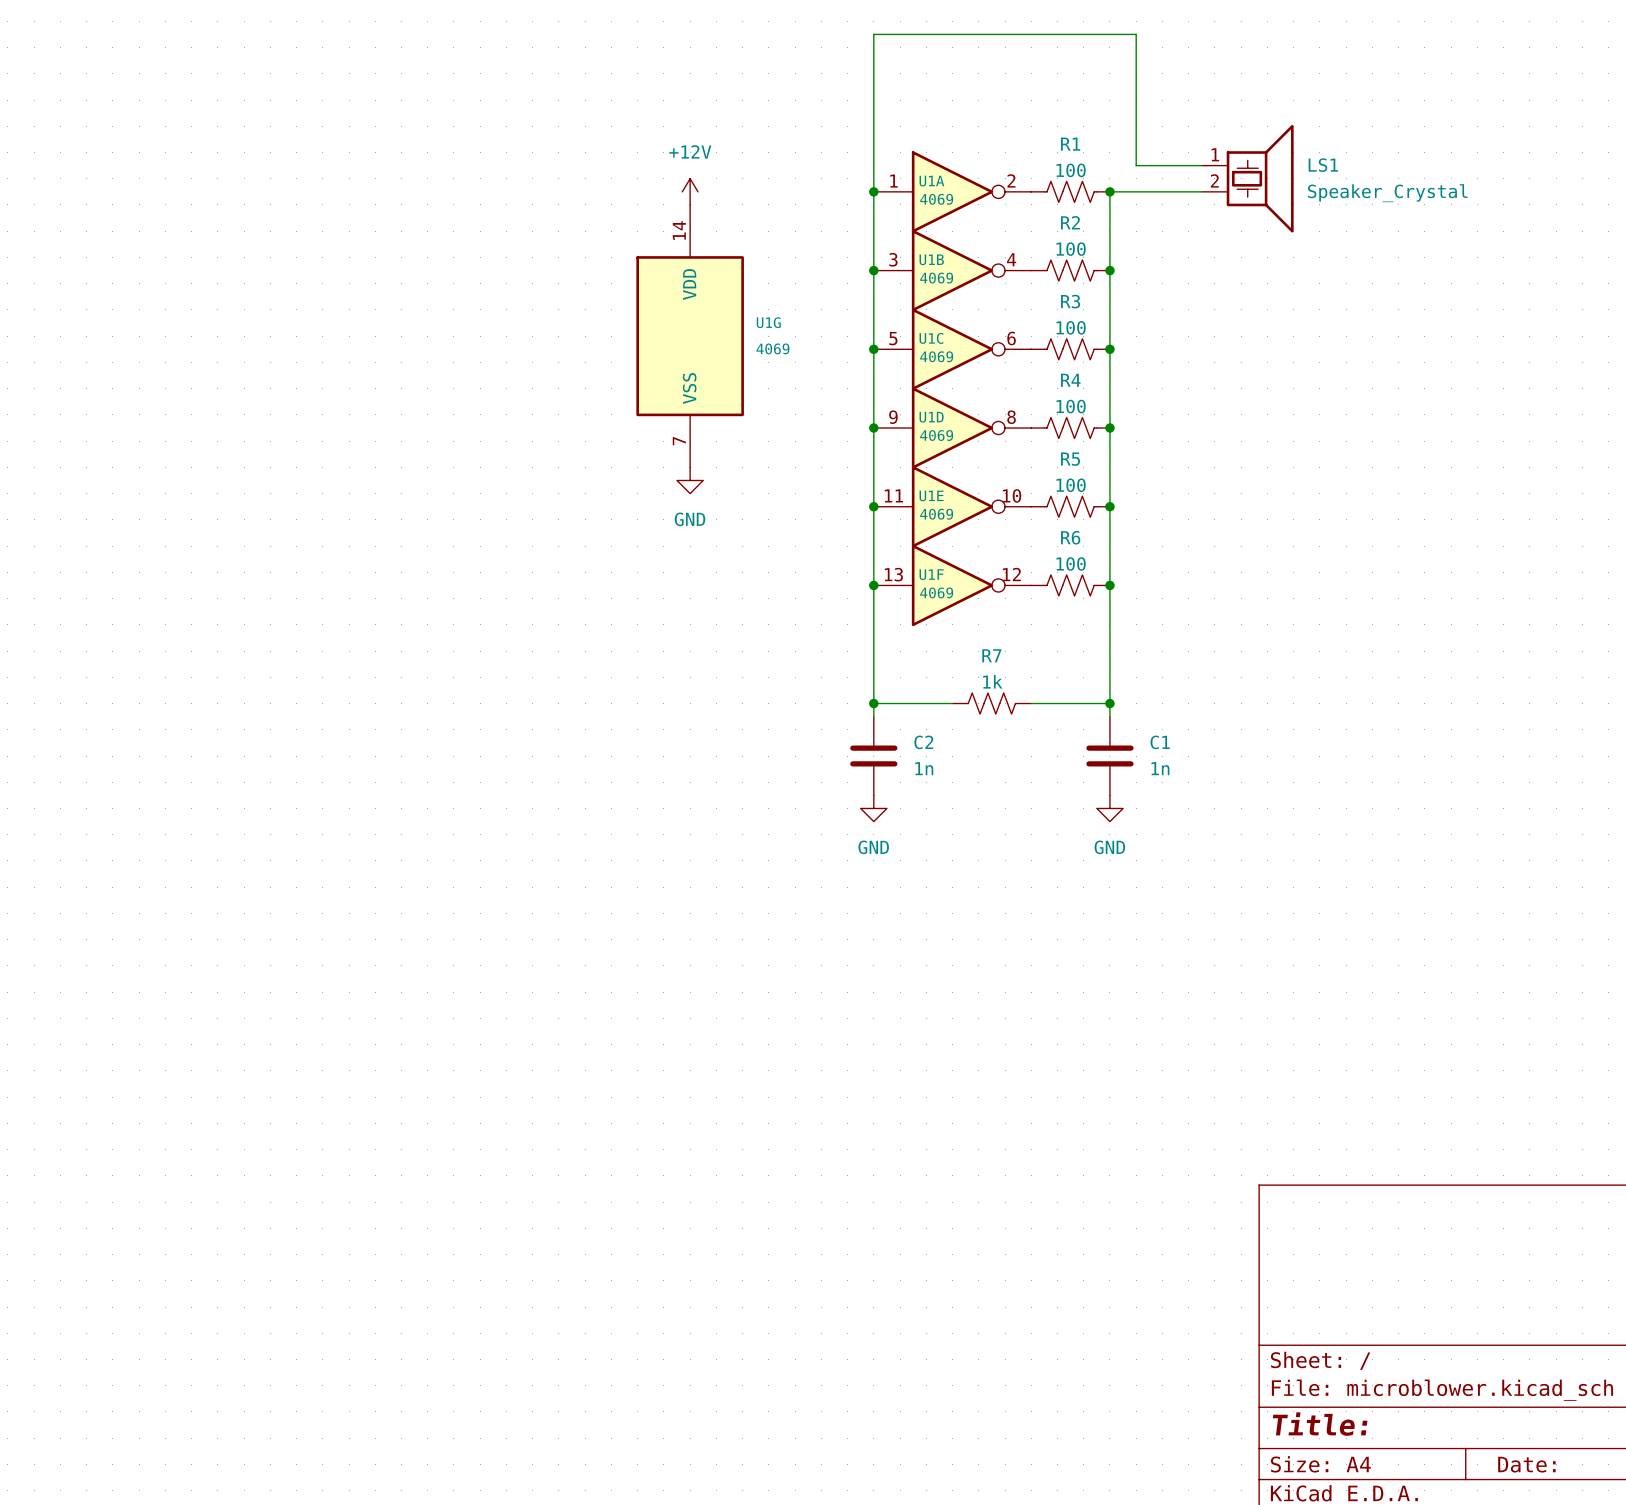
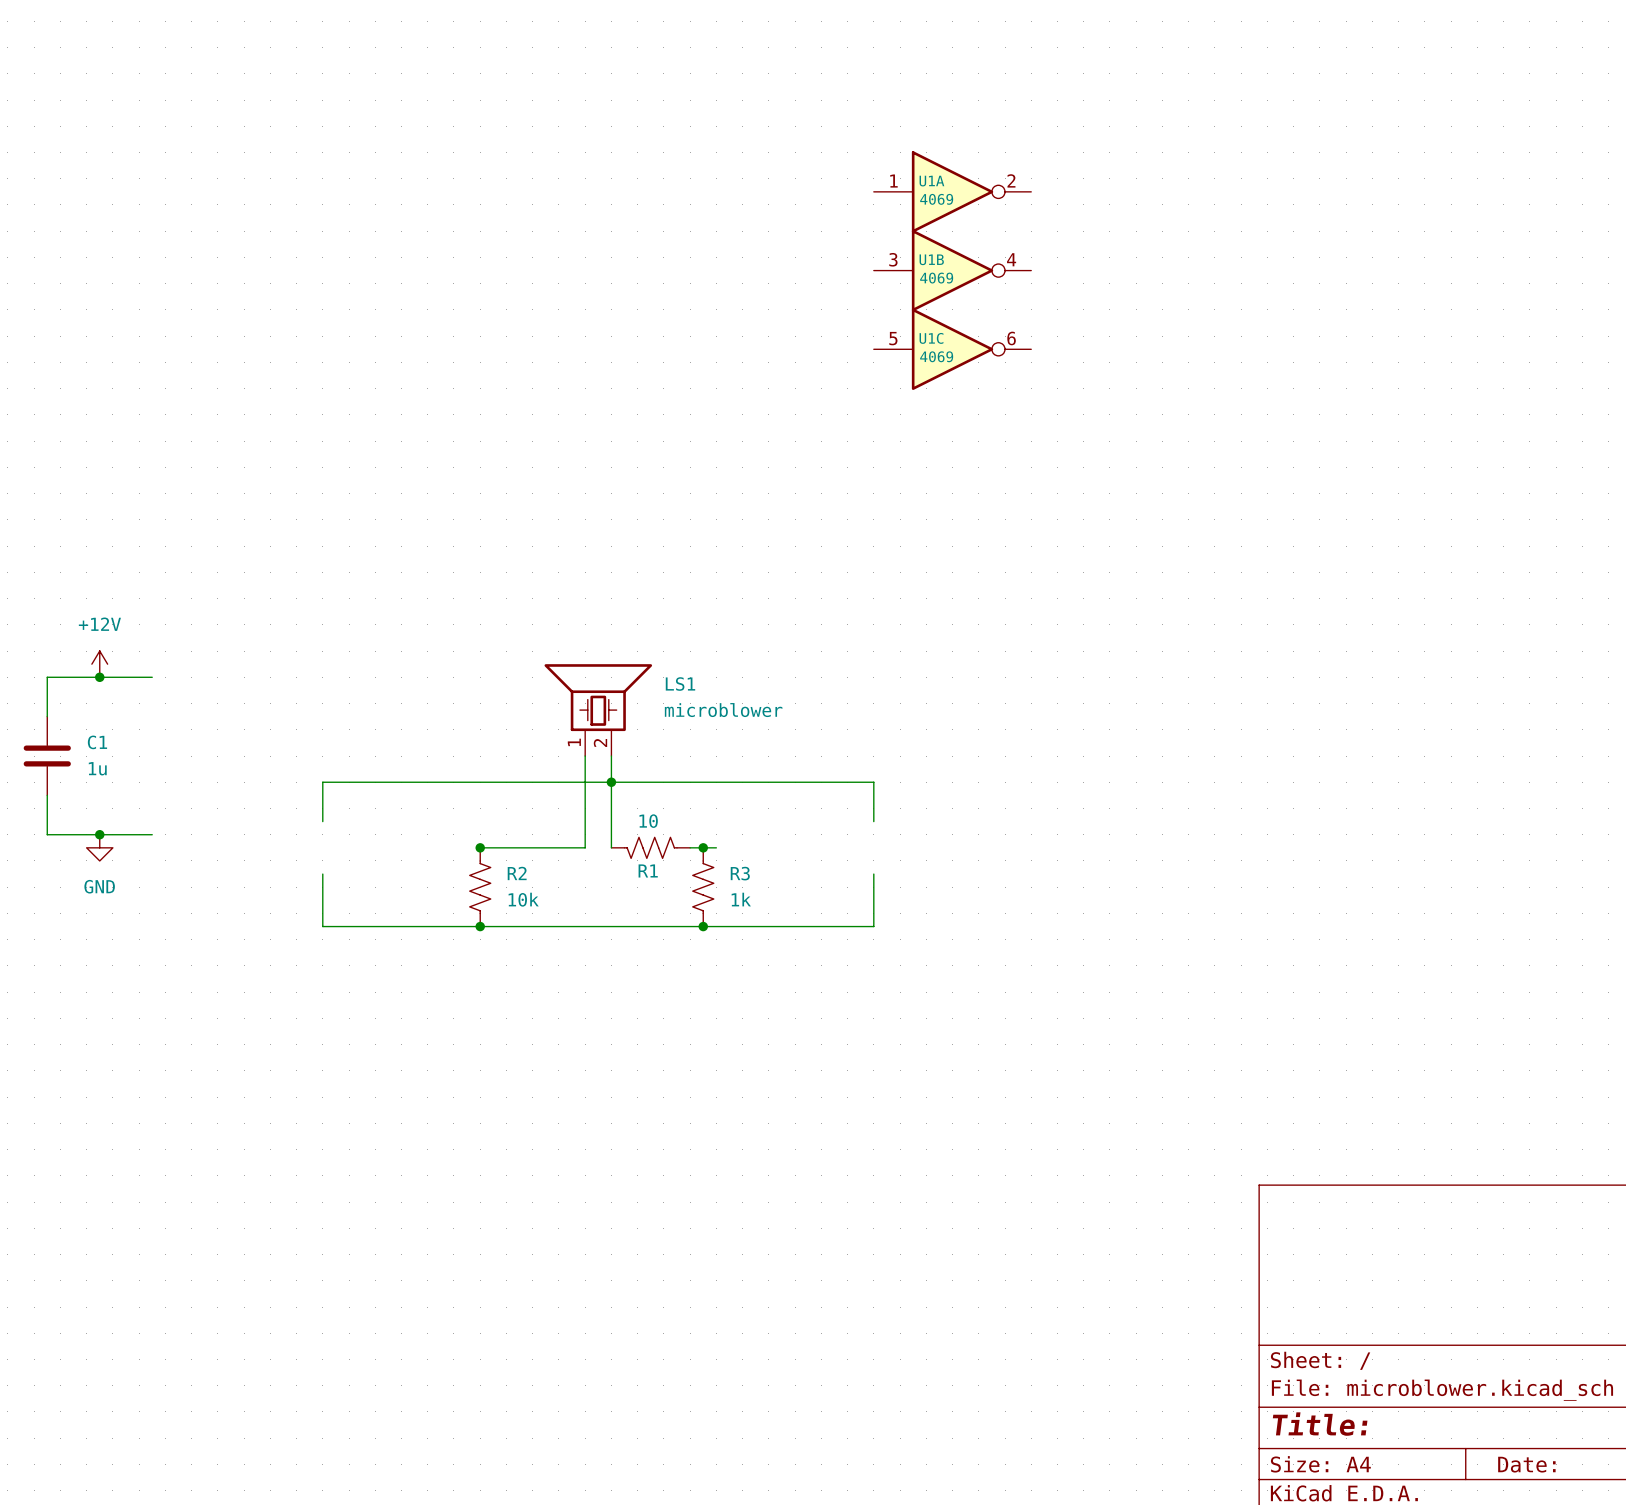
R1 name position: R1 (1070, 144) -> R1 (648, 870)
wire: (1201, 165) (1136, 165) (1136, 34) (873, 34) (873, 716) -> none
R1 value: 100 (1071, 170) -> 10 (648, 821)
LS1 position: (1247, 178) -> (598, 710)
LS1 rotation: 0° (1260, 178) -> 90° counterclockwise (598, 697)
power symbol: +12V (690, 191) -> none
junction: (873, 191) -> none
R1 flip: as is (1070, 191) -> left-right (650, 847)
R1 position: (1070, 191) -> (650, 847)
junction: (1109, 191) -> none
wire: (1201, 191) (1109, 191) (1109, 716) -> none
LS1 value: Speaker_Crystal (1387, 193) -> microblower (723, 710)
R2 value: 100 (1071, 249) -> 10k (523, 899)
junction: (873, 270) -> none
R2 rotation: 0° (1070, 270) -> 90° clockwise (480, 887)
R2 position: (1070, 270) -> (480, 887)
junction: (1109, 270) -> none
R3 value: 100 (1071, 327) -> 1k (741, 899)
U1G: 4069 (690, 336) -> none
junction: (873, 349) -> none
R3 rotation: 0° (1070, 349) -> 90° clockwise (703, 887)
R3 position: (1070, 349) -> (703, 887)
junction: (1109, 349) -> none
junction: (873, 428) -> none
U1D: 4069 (952, 428) -> none
R4: 100 (1070, 428) -> none
junction: (1109, 428) -> none
power symbol: GND (690, 480) -> none
junction: (873, 506) -> none
U1E: 4069 (952, 506) -> none
R5: 100 (1070, 506) -> none
junction: (1109, 506) -> none
junction: (873, 585) -> none
U1F: 4069 (952, 585) -> none
R6: 100 (1070, 585) -> none
junction: (1109, 585) -> none
power symbol: none -> +12V (99, 664)
junction: none -> (99, 677)
wire: none -> (152, 677) (47, 677) (47, 716)
wire: (873, 703) (952, 703) -> none
junction: (873, 703) -> none
R7: 1k (991, 703) -> none
wire: (1031, 703) (1109, 703) -> none
junction: (1109, 703) -> none
wire: none -> (585, 756) (585, 847) (480, 847)
wire: none -> (611, 756) (611, 847)
C2: 1n (873, 756) -> none
C1 position: (1109, 756) -> (47, 756)
C1 value: 1n (1160, 768) -> 1u (97, 768)
junction: none -> (611, 782)
wire: none -> (47, 795) (47, 834) (152, 834)
power symbol: GND (873, 808) -> none
power symbol: GND (1109, 808) -> none
wire: none -> (322, 821) (322, 782) (873, 782) (873, 821)
junction: none -> (99, 834)
power symbol: none -> GND (99, 847)
junction: none -> (480, 847)
wire: none -> (690, 847) (716, 847)
junction: none -> (703, 847)
wire: none -> (322, 874) (322, 926) (873, 926) (873, 874)
junction: none -> (480, 926)
junction: none -> (703, 926)

